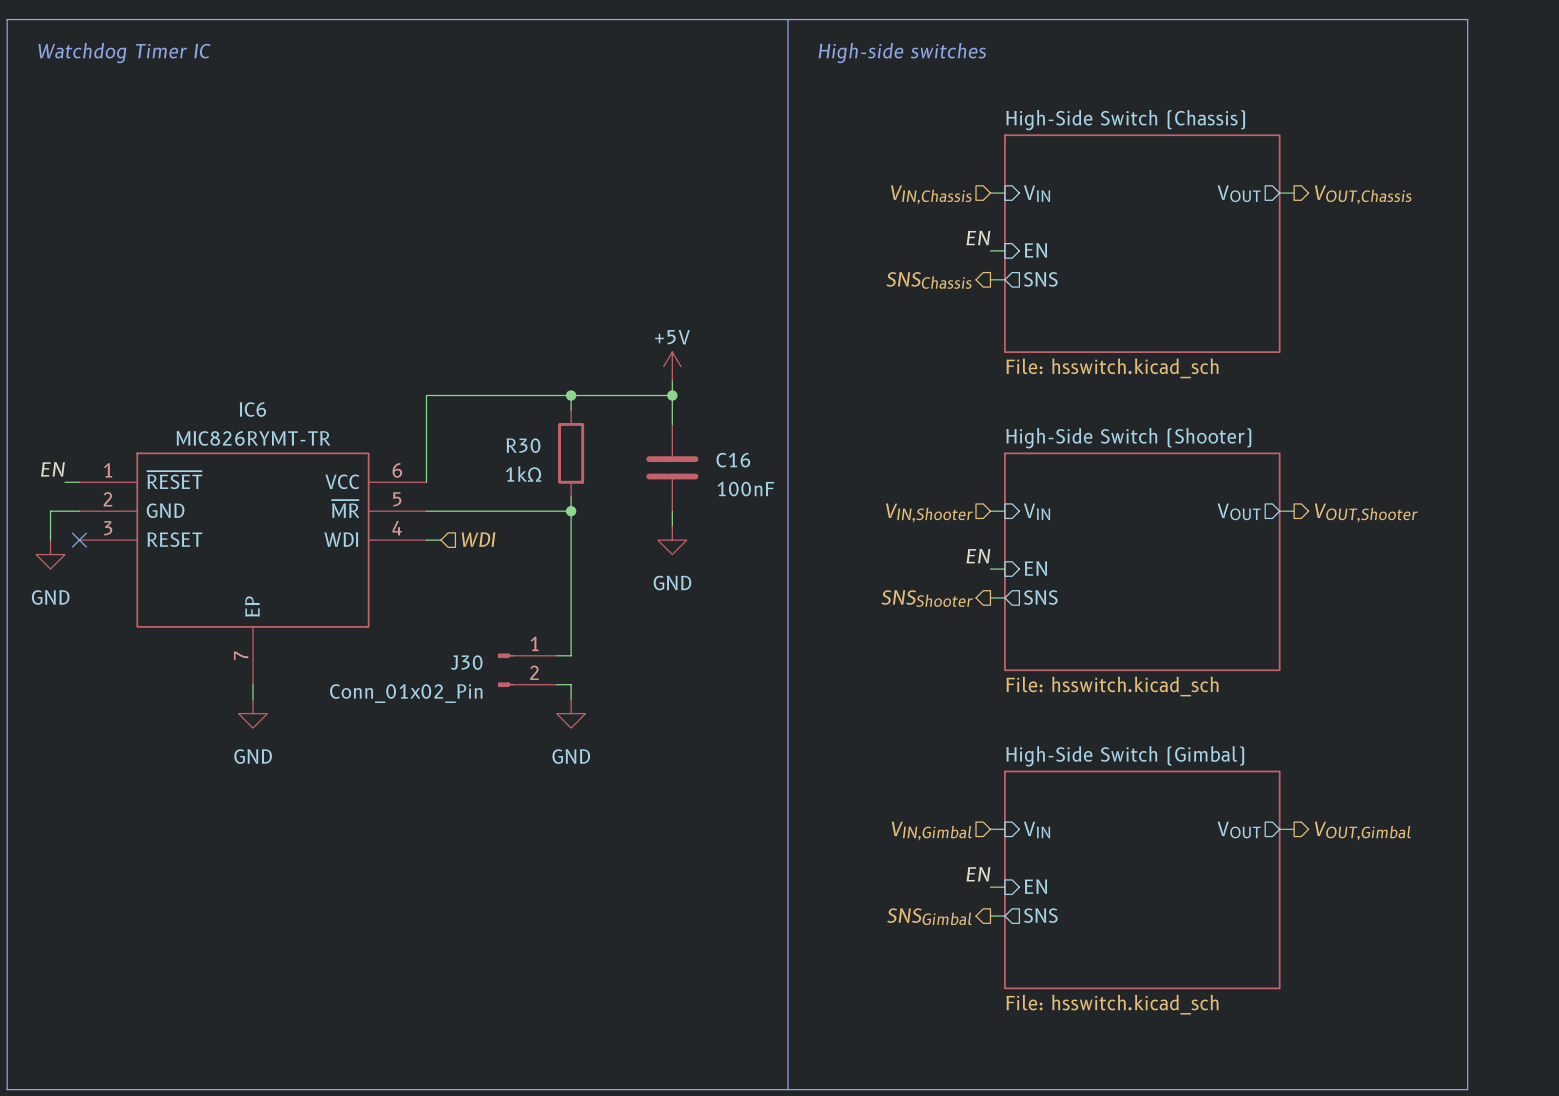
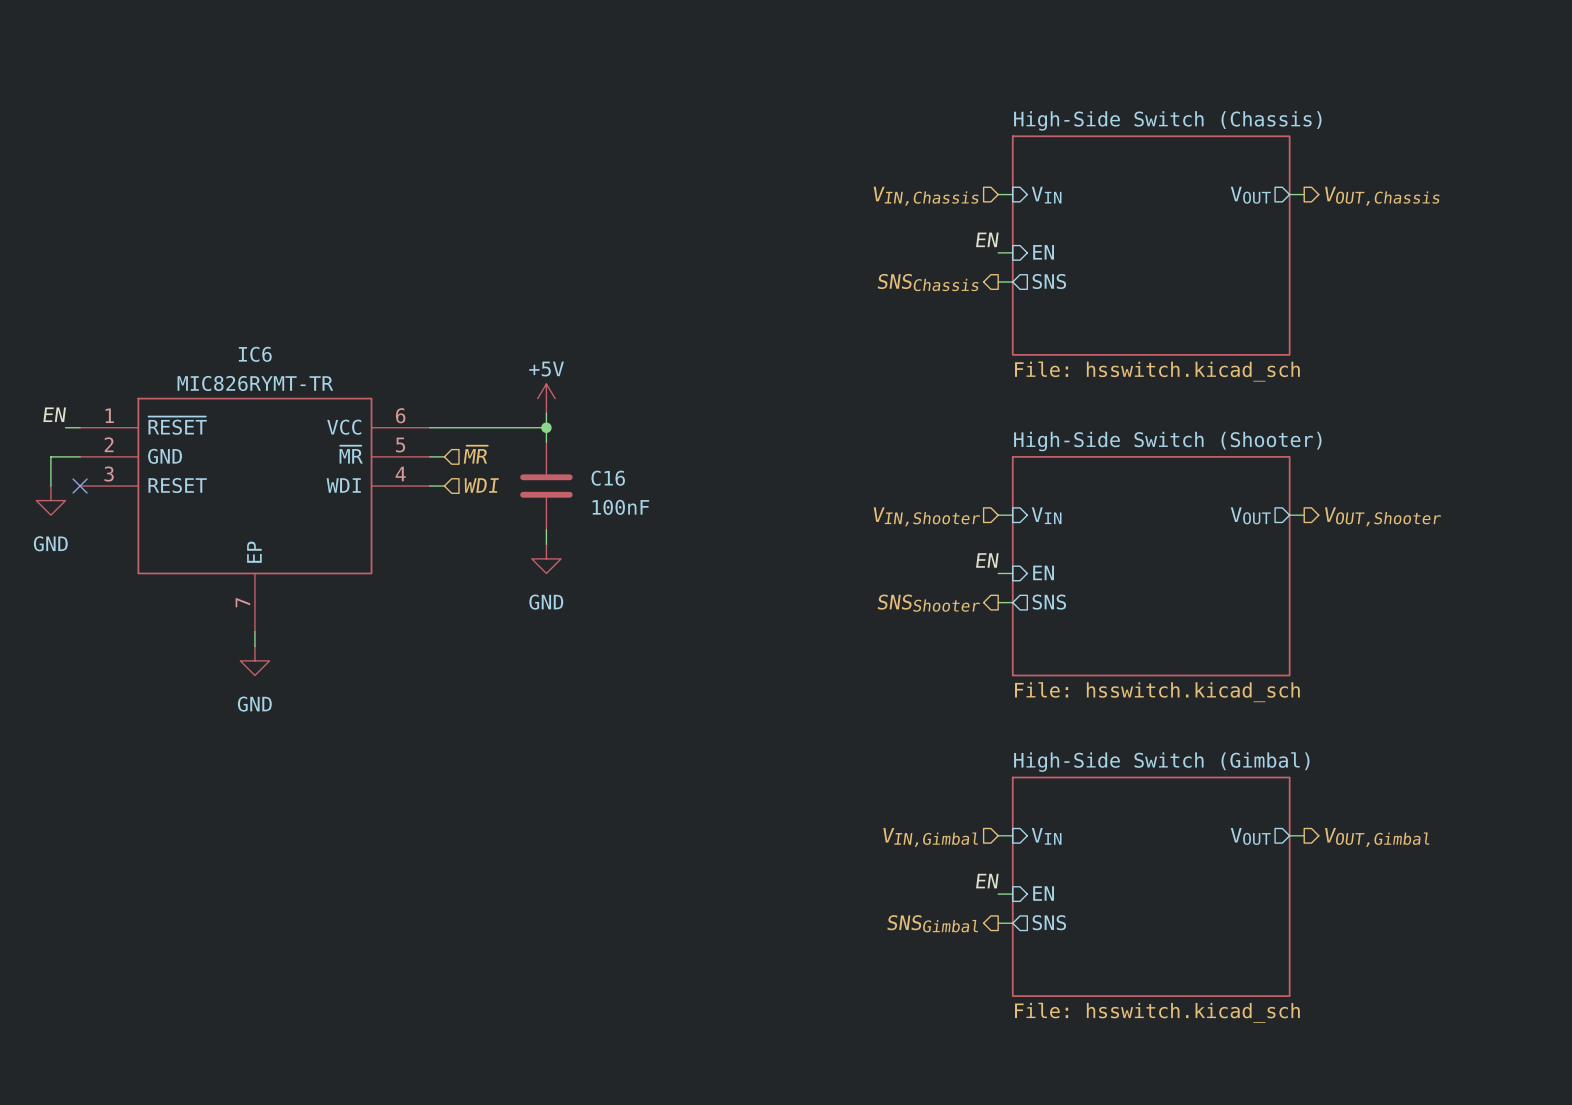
line: (7, 19) (7, 1089) (1467, 1089) (1467, 19) (7, 19) -> none
line: (788, 19) (788, 1089) -> none
text: Watchdog Timer IC (124, 53) -> none
text: High-side switches (902, 53) -> none
power symbol position: +5V (672, 366) -> +5V (546, 398)
wire: (672, 381) (672, 424) -> none
wire: (571, 395) (571, 409) -> none
junction position: (571, 395) -> (546, 427)
wire: (672, 395) (426, 395) (426, 482) -> (444, 486) (429, 486)
junction: (672, 395) -> none
wire: none -> (546, 413) (546, 442)
wire: none -> (429, 427) (546, 427)
hierarchical label: none -> ~{MR} (475, 454)
R30: 1kΩ (571, 453) -> none
C16 position: (672, 467) -> (546, 486)
label position: EN (52, 469) -> EN (54, 414)
wire: (64, 482) (79, 482) -> (65, 427) (80, 427)
wire: (571, 496) (571, 655) (556, 655) -> none
wire: (79, 511) (50, 511) (50, 540) -> (80, 456) (50, 456) (50, 486)
wire: (426, 511) (571, 511) -> none
junction: (571, 511) -> none
wire: (672, 511) (672, 525) -> (546, 529) (546, 544)
hierarchical label position: WDI (478, 539) -> WDI (481, 485)
no-connect mark position: (79, 540) -> (80, 486)
wire: (426, 540) (440, 540) -> (429, 456) (444, 456)
power symbol: GND (672, 540) -> none
power symbol position: GND (50, 554) -> GND (50, 500)
power symbol: none -> GND (546, 558)
IC6 position: (252, 568) -> (254, 514)
J30: Conn_01x02_Pin (527, 670) -> none
wire: (556, 684) (571, 684) (571, 699) -> none
power symbol position: GND (252, 713) -> GND (254, 660)
power symbol: GND (571, 713) -> none

